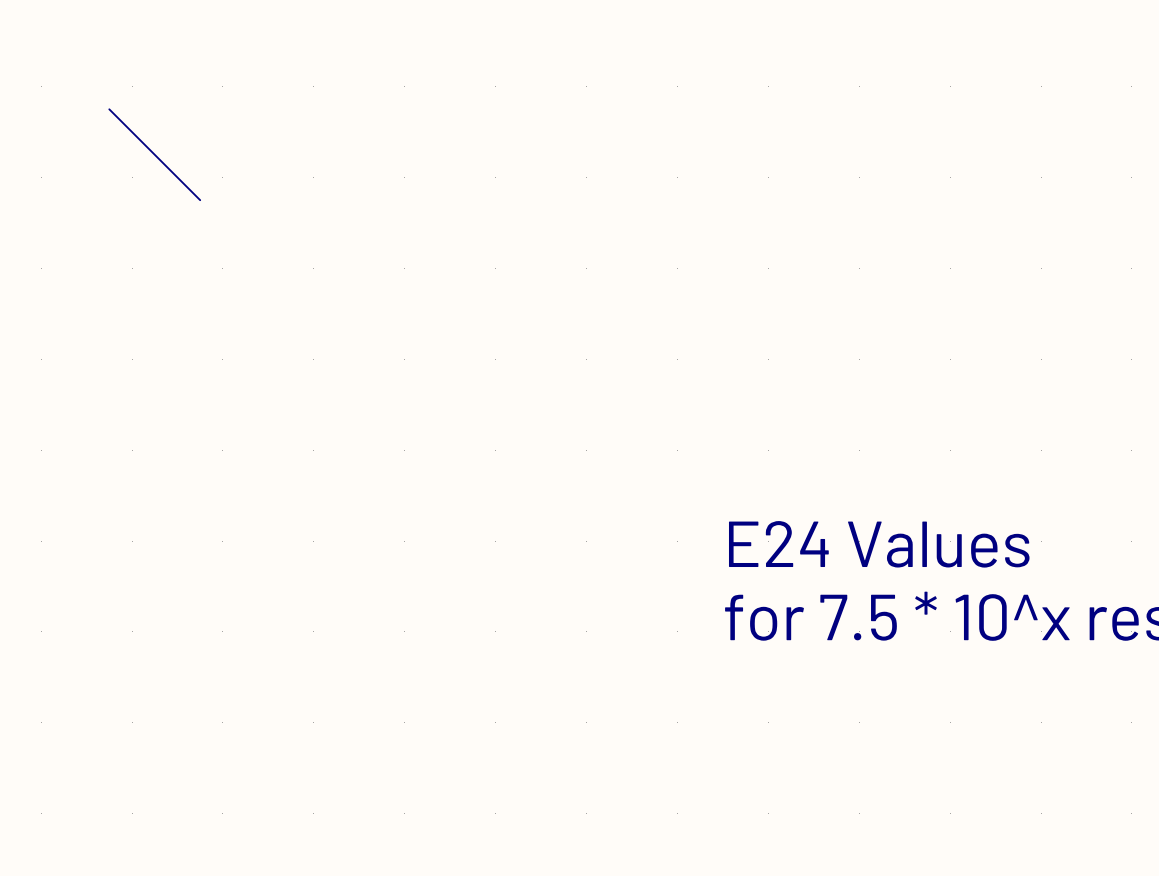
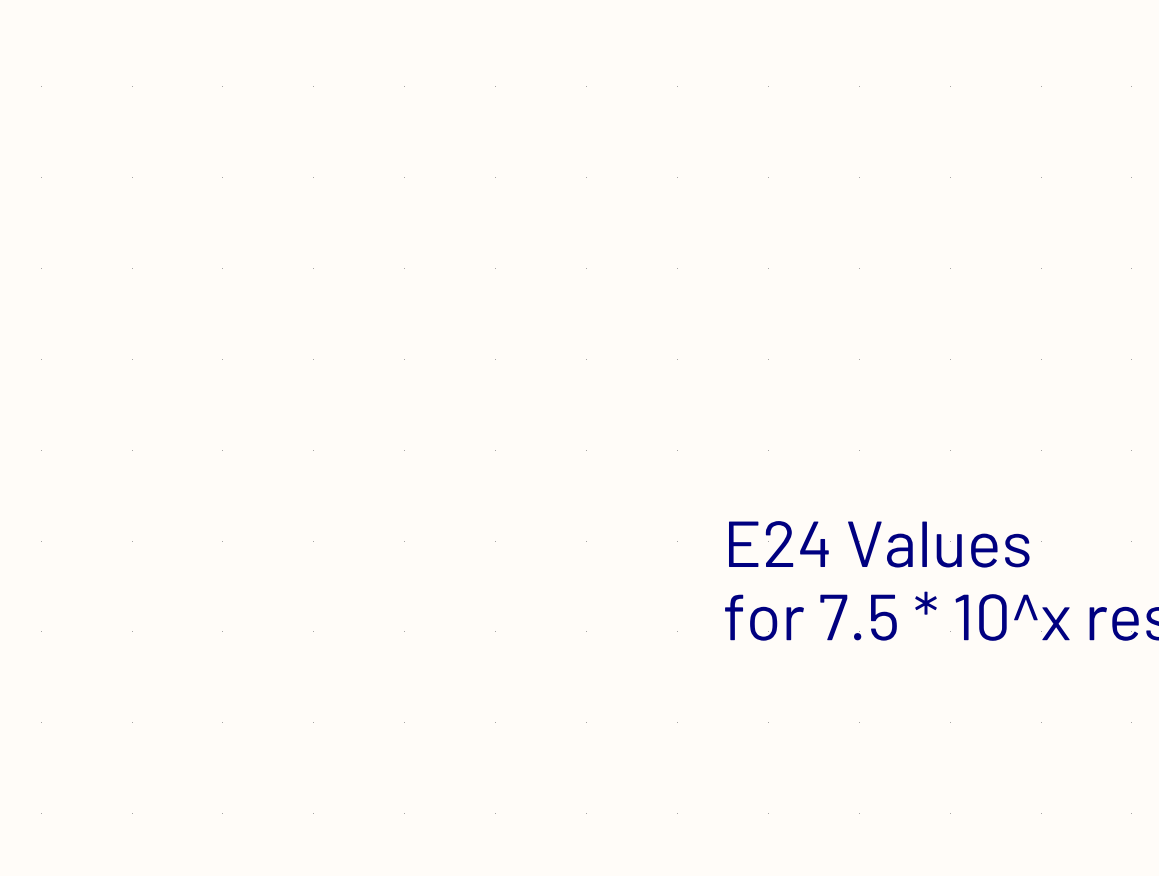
bus: (109, 109) (200, 200) -> none

